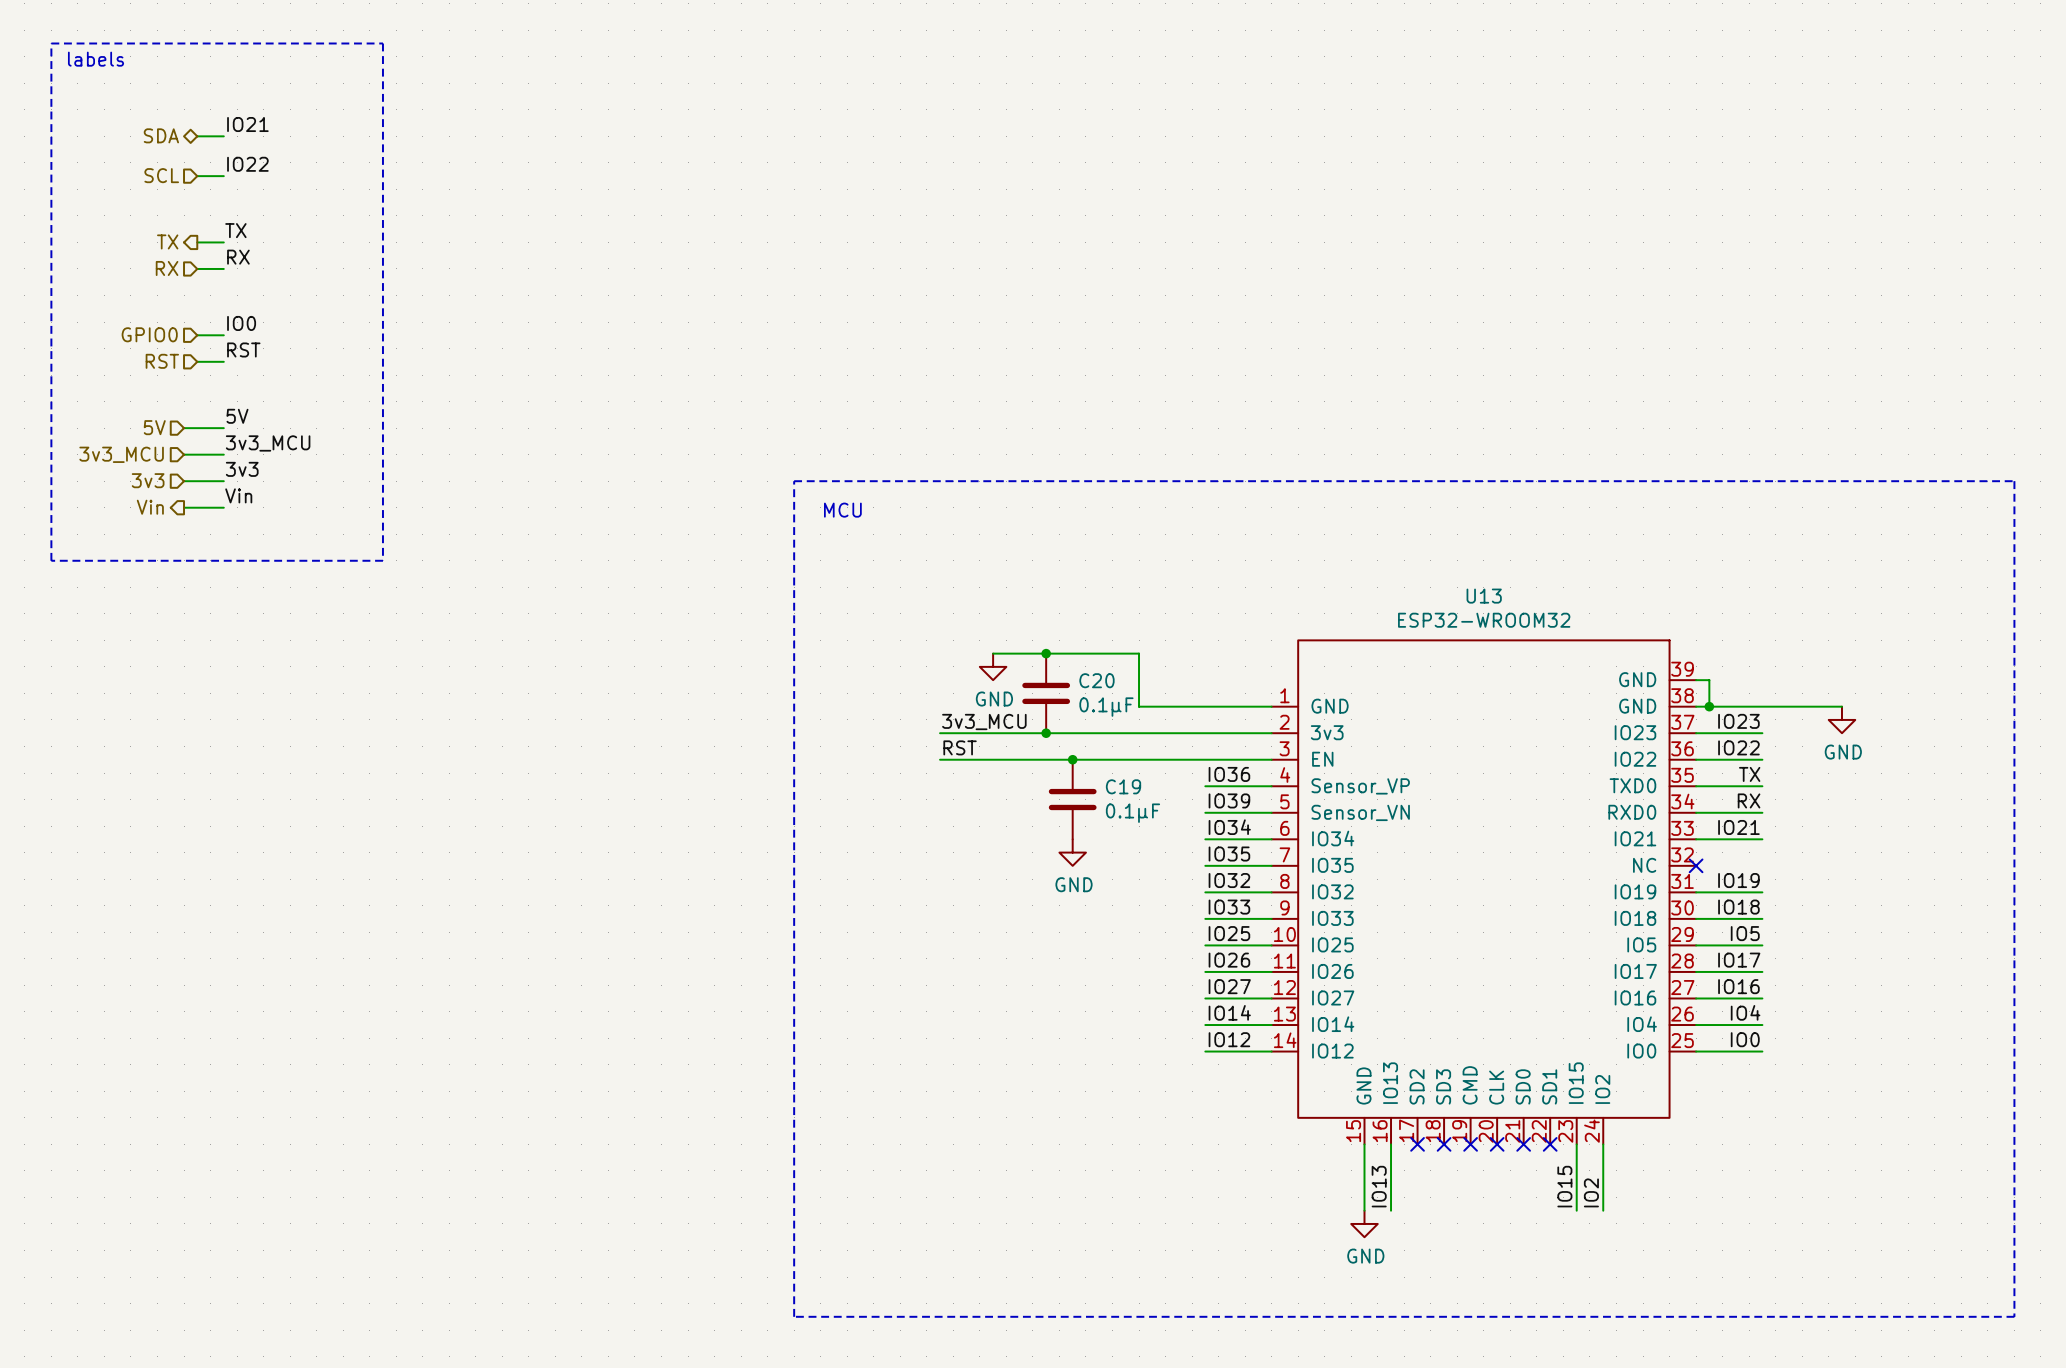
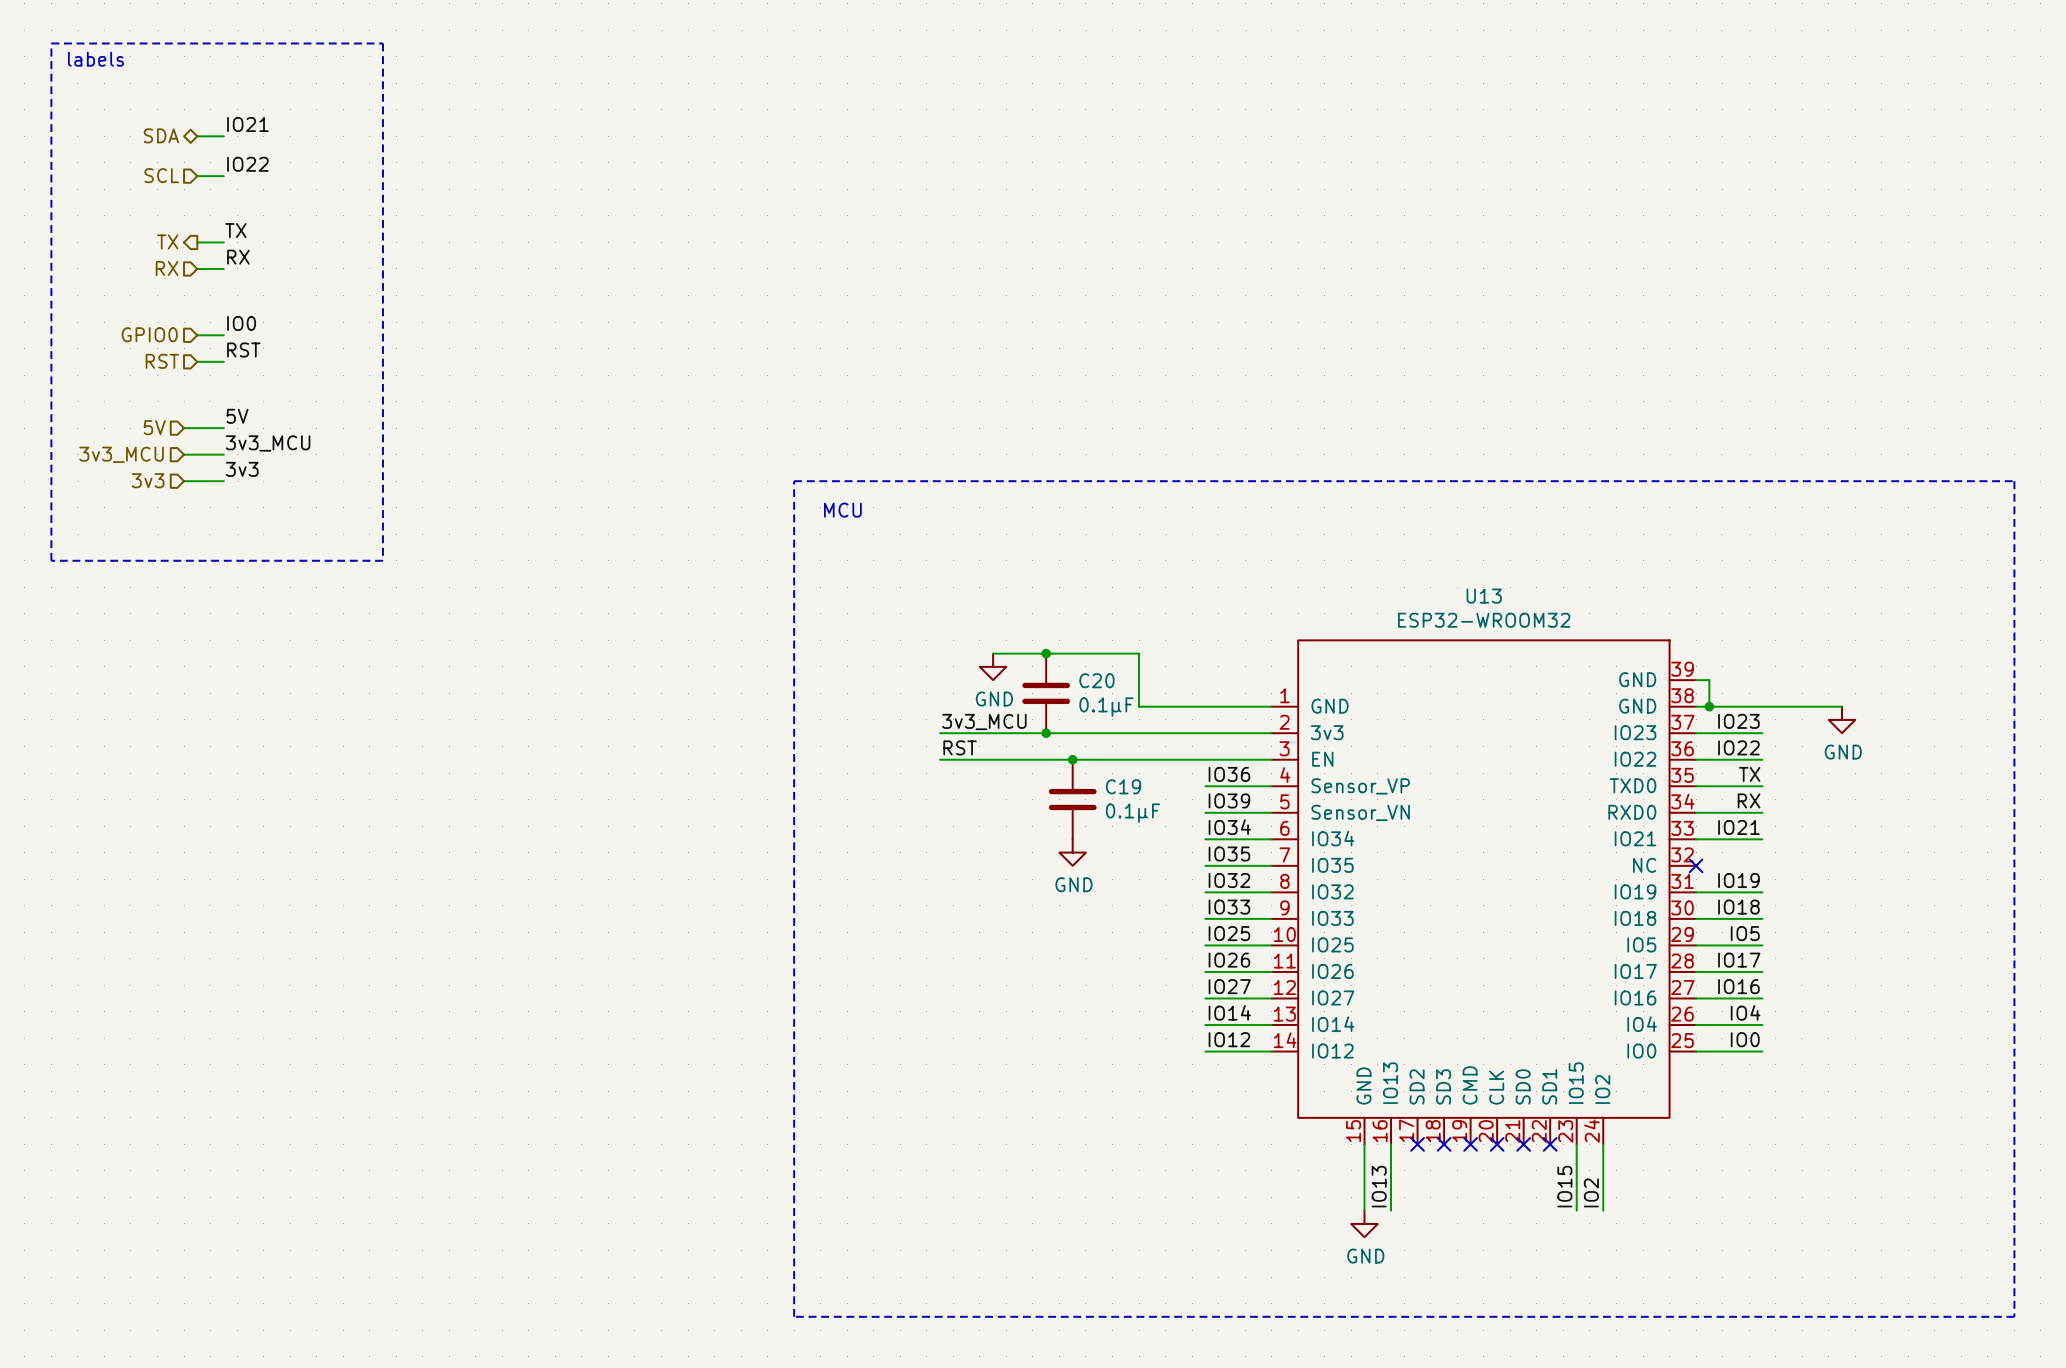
label: Vin (238, 495) -> none
hierarchical label: Vin (150, 507) -> none
wire: (184, 507) (223, 507) -> none

